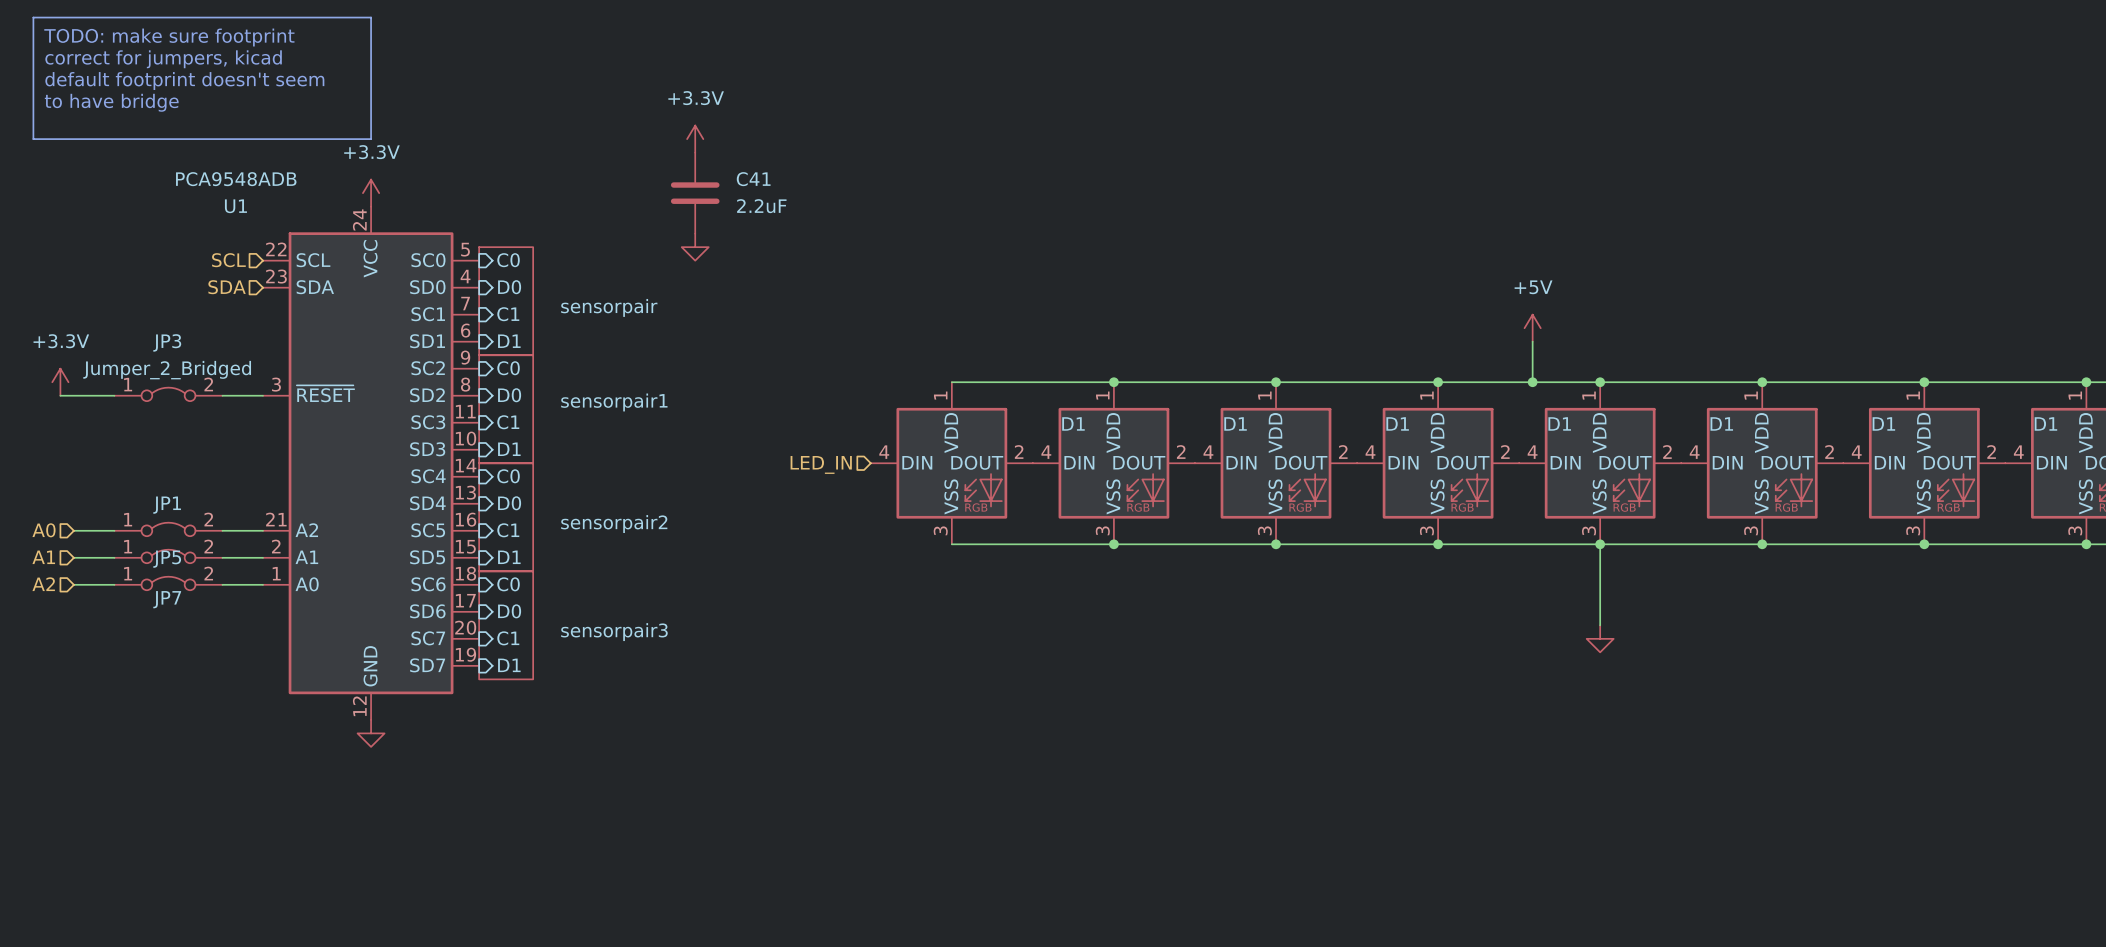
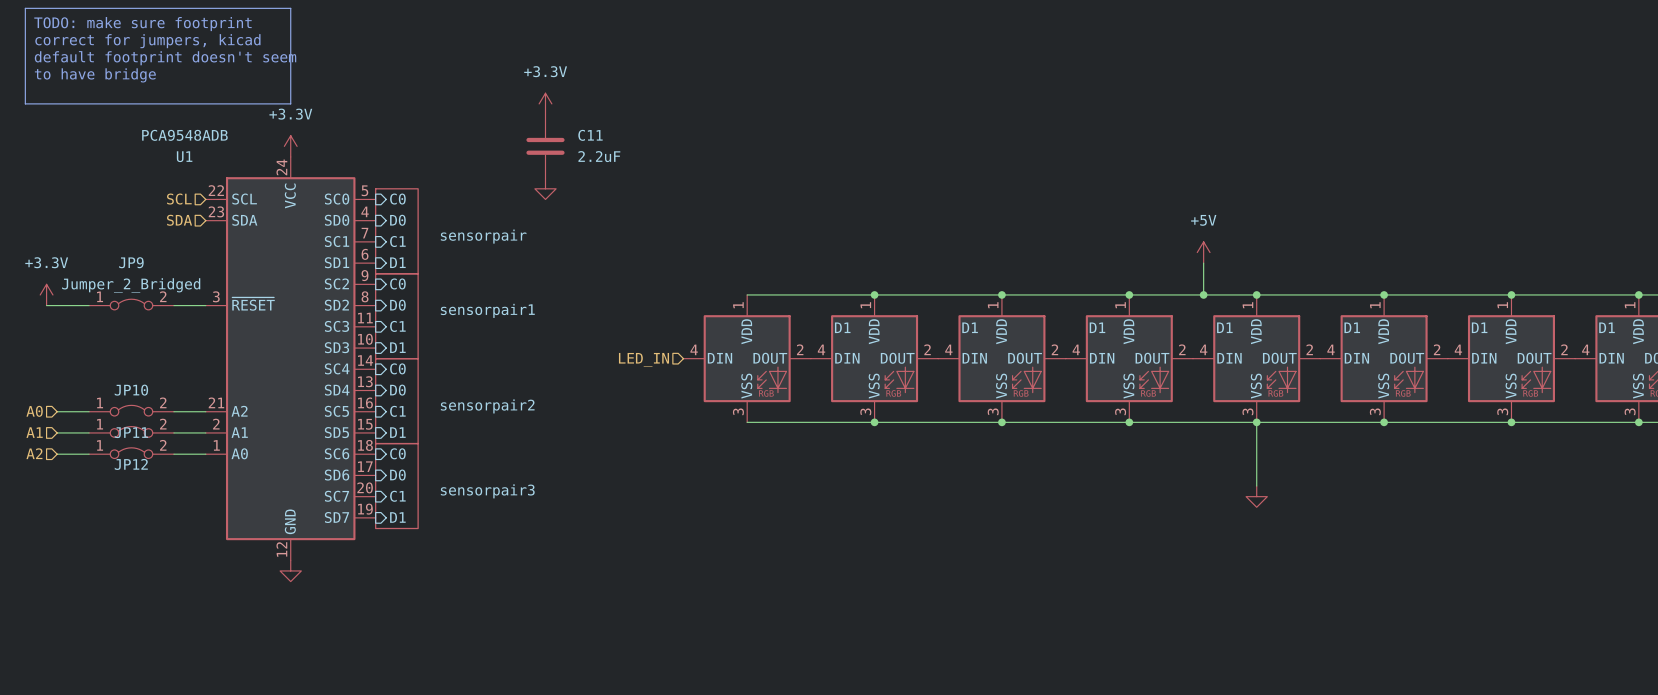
C41 name: C41 (753, 179) -> C11 (590, 135)
JP3 name: JP3 (167, 342) -> JP9 (131, 262)
JP1 name: JP1 (167, 505) -> JP10 (131, 390)
JP5 name: JP5 (167, 559) -> JP11 (131, 432)
JP7 name: JP7 (167, 599) -> JP12 (131, 464)

